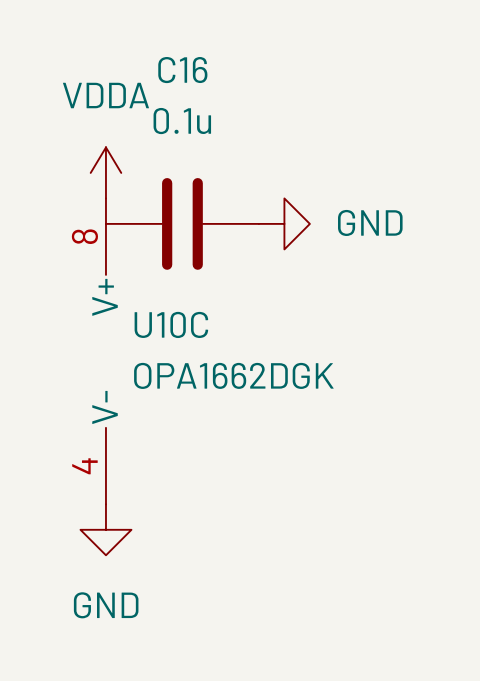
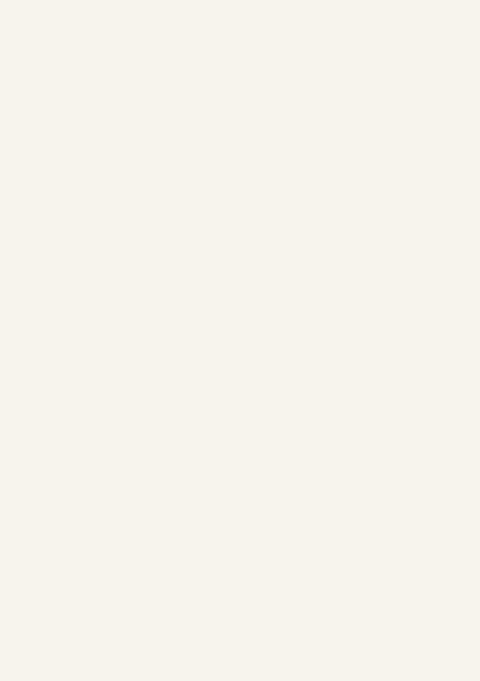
power symbol: VDDA (105, 172) -> none
C16: 0.1u (182, 223) -> none
power symbol: GND (284, 223) -> none
U10C: OPA1662DGK (105, 351) -> none
power symbol: GND (105, 529) -> none

